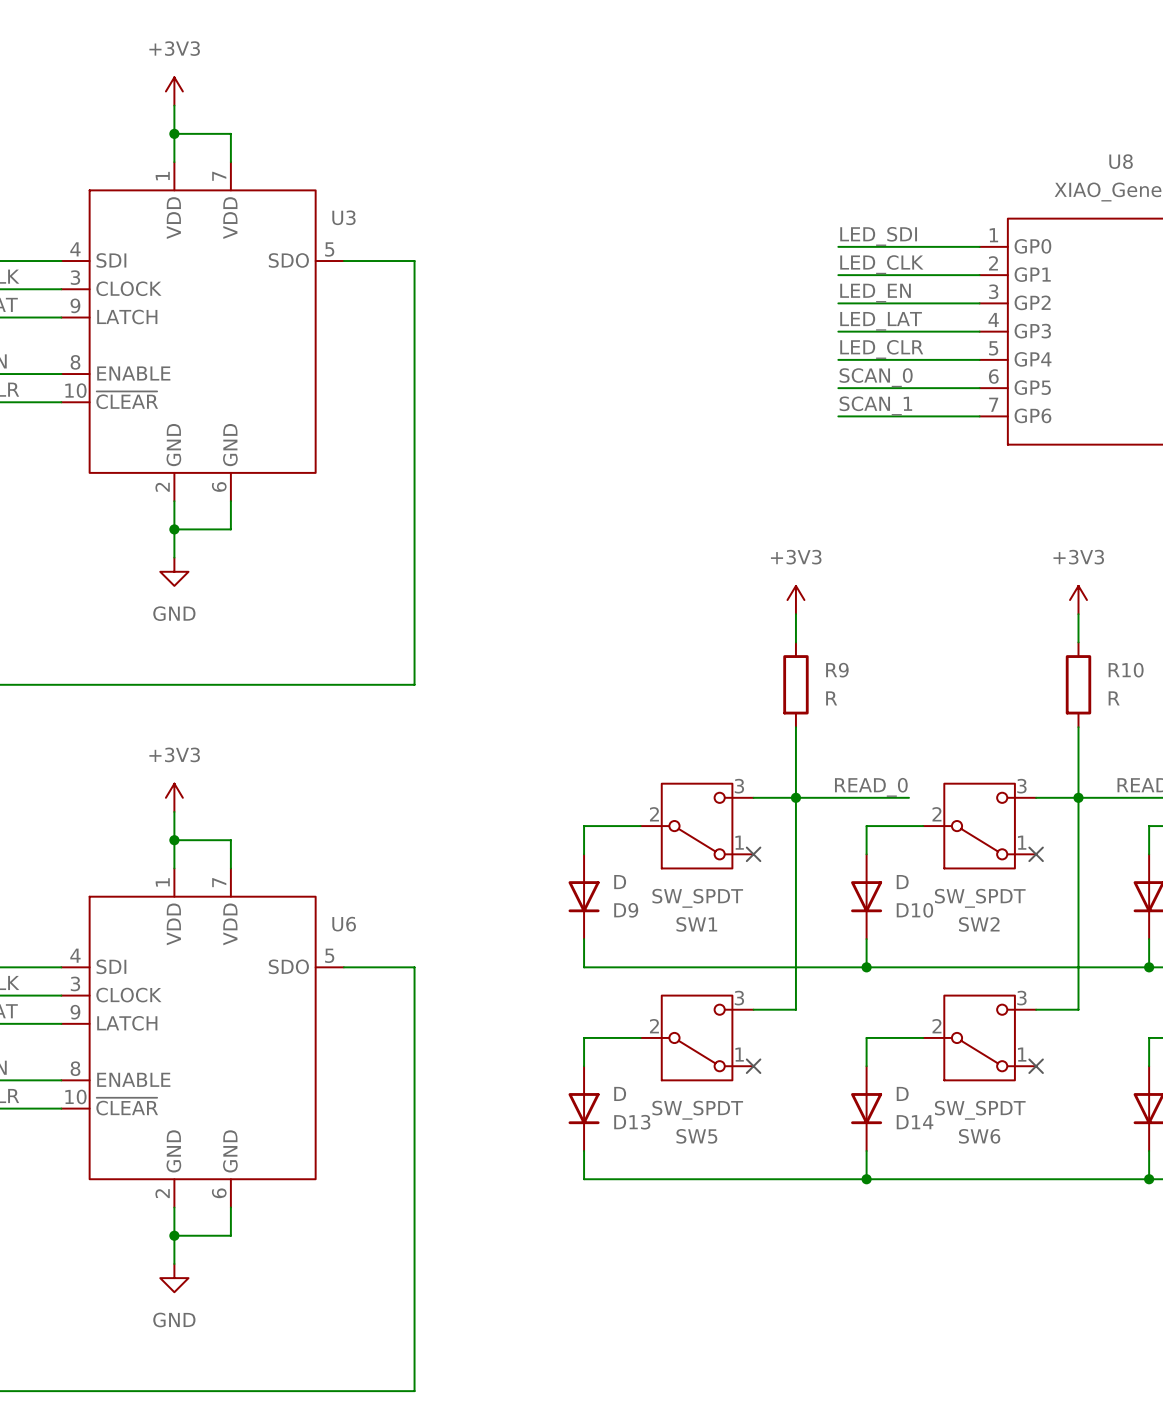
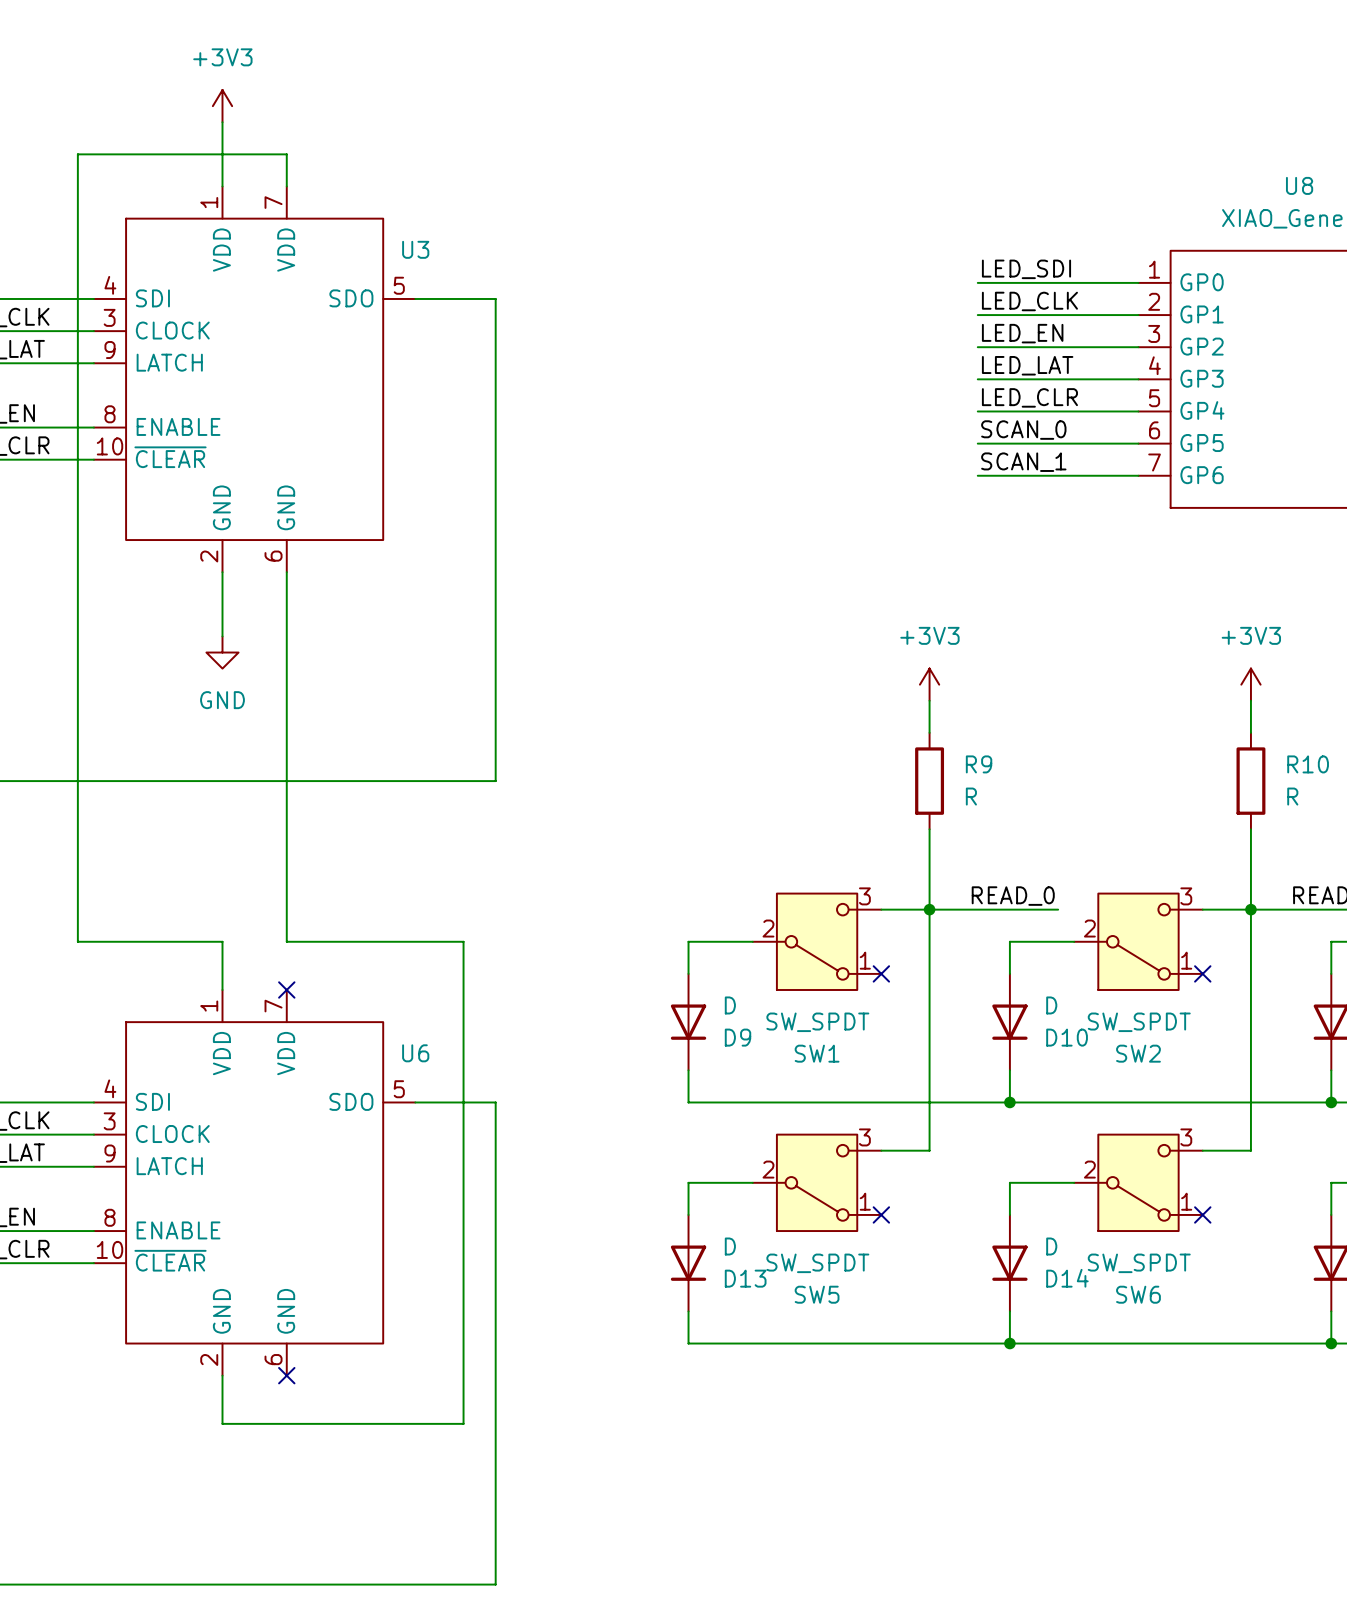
junction: (174, 133) -> none
wire: (174, 529) (230, 529) -> (222, 1423) (463, 1423) (463, 941) (286, 941) (286, 604)
junction: (174, 529) -> none
power symbol: +3V3 (174, 797) -> none
wire: (174, 811) (174, 826) -> (222, 154) (77, 154) (77, 941) (222, 941)
wire: (174, 840) (230, 840) (230, 868) -> none
junction: (174, 840) -> none
no-connect mark: none -> (286, 989)
wire: (230, 1207) (230, 1235) (174, 1235) -> none
no-connect mark: none -> (286, 1375)
junction: (174, 1235) -> none
wire: (174, 1249) (174, 1263) -> none
power symbol: GND (174, 1278) -> none

